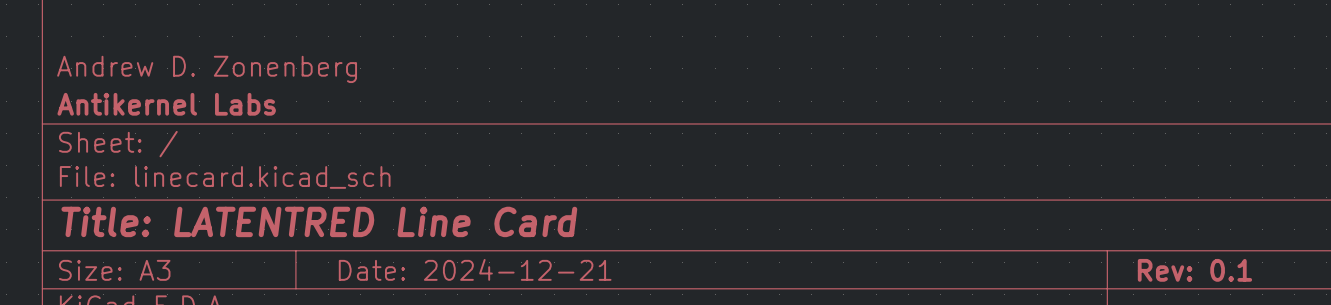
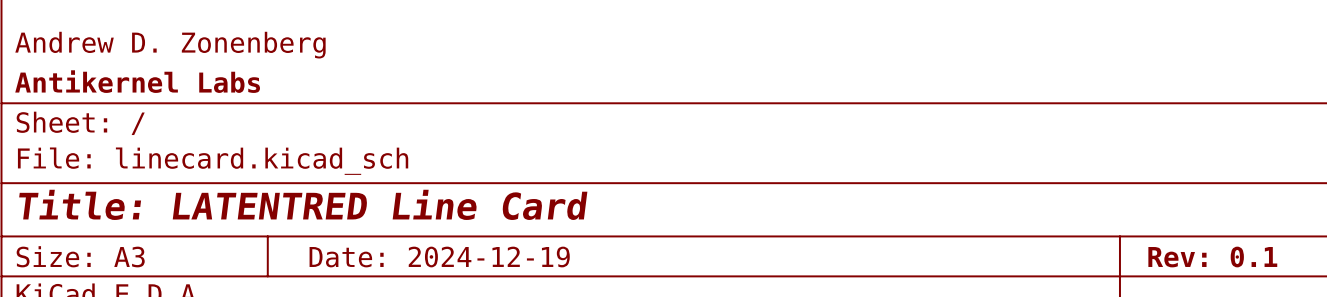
title block: Date: 2024-12-21 (475, 269) -> Date: 2024-12-19 (439, 257)

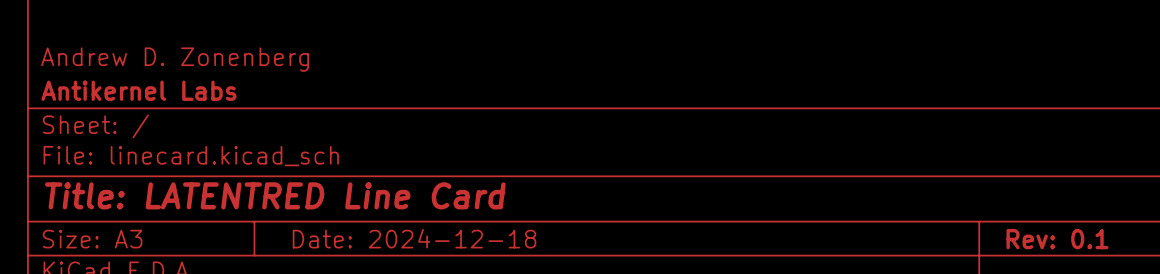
title block: Date: 2024-12-19 (439, 257) -> Date: 2024-12-18 (414, 238)

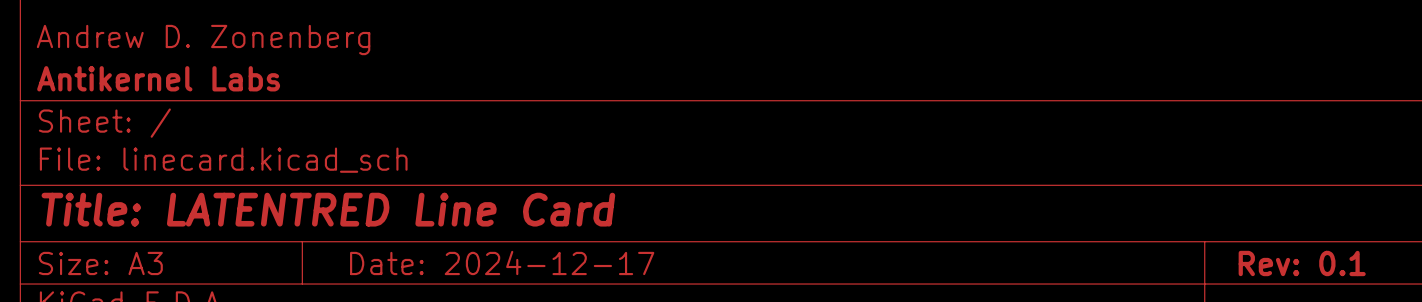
title block: Date: 2024-12-18 (414, 238) -> Date: 2024-12-17 (502, 262)

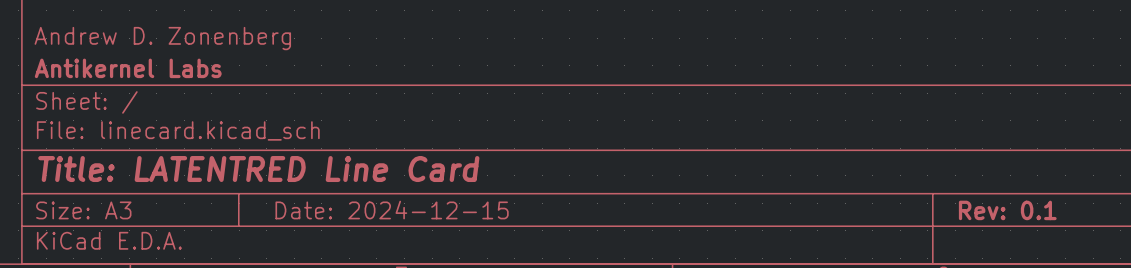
title block: Date: 2024-12-17 (502, 262) -> Date: 2024-12-15 (392, 210)

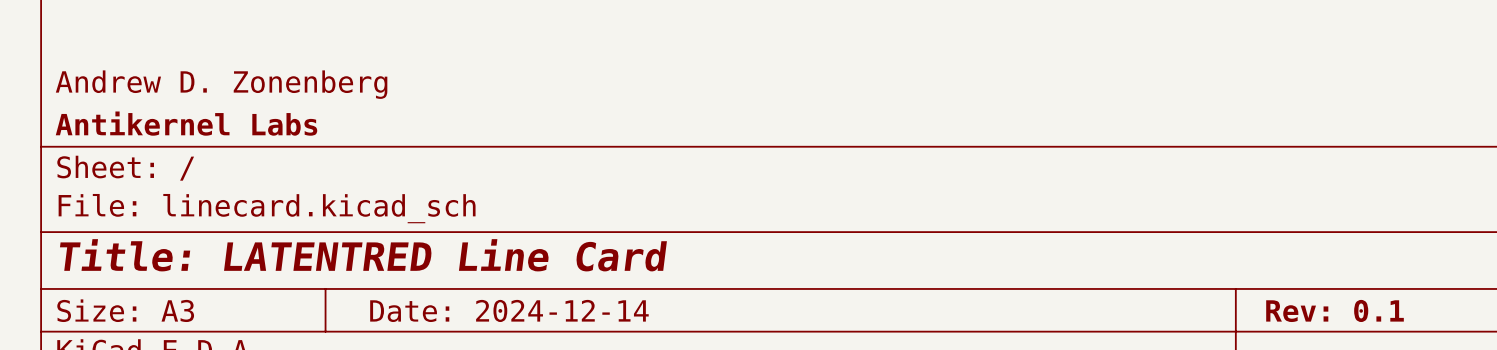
title block: Date: 2024-12-15 (392, 210) -> Date: 2024-12-14 (509, 310)

